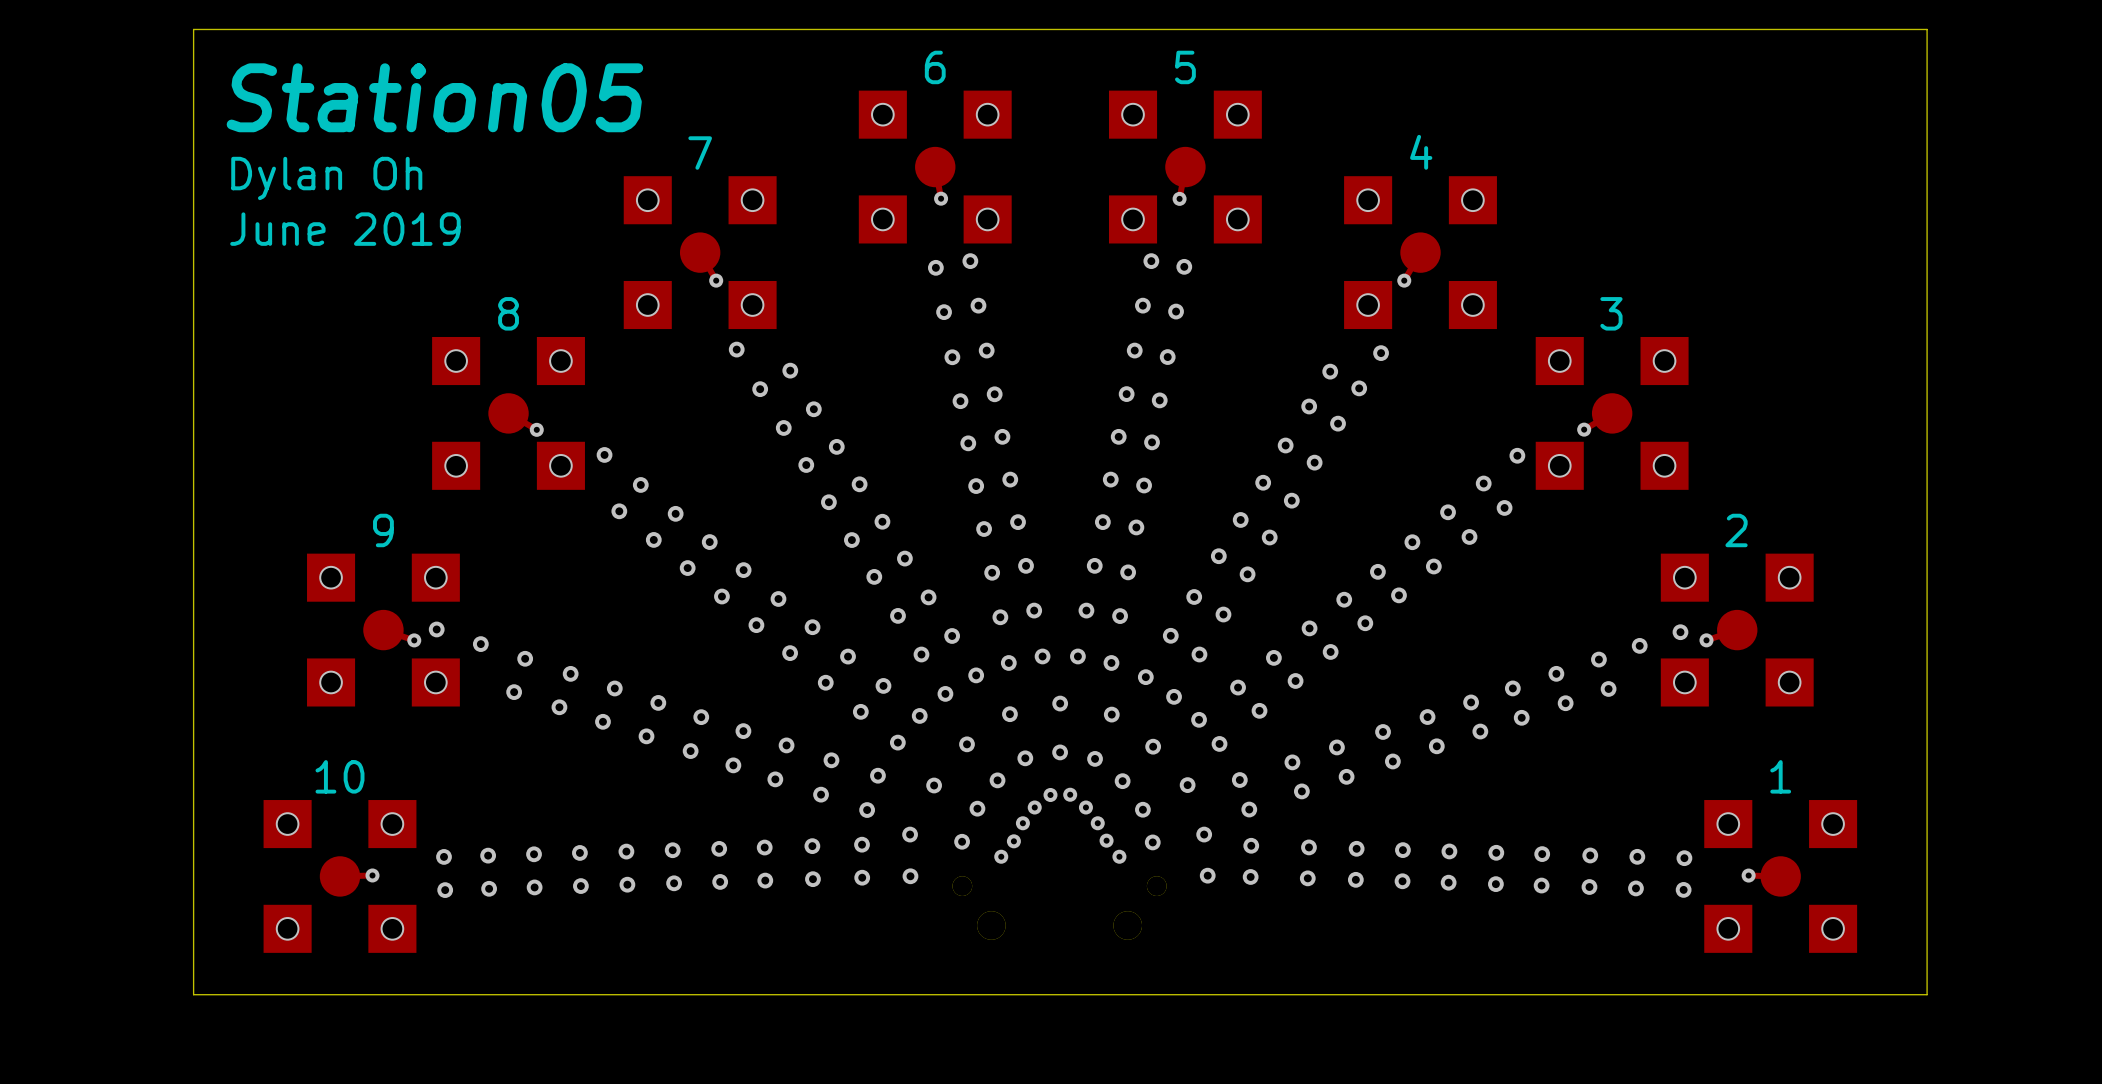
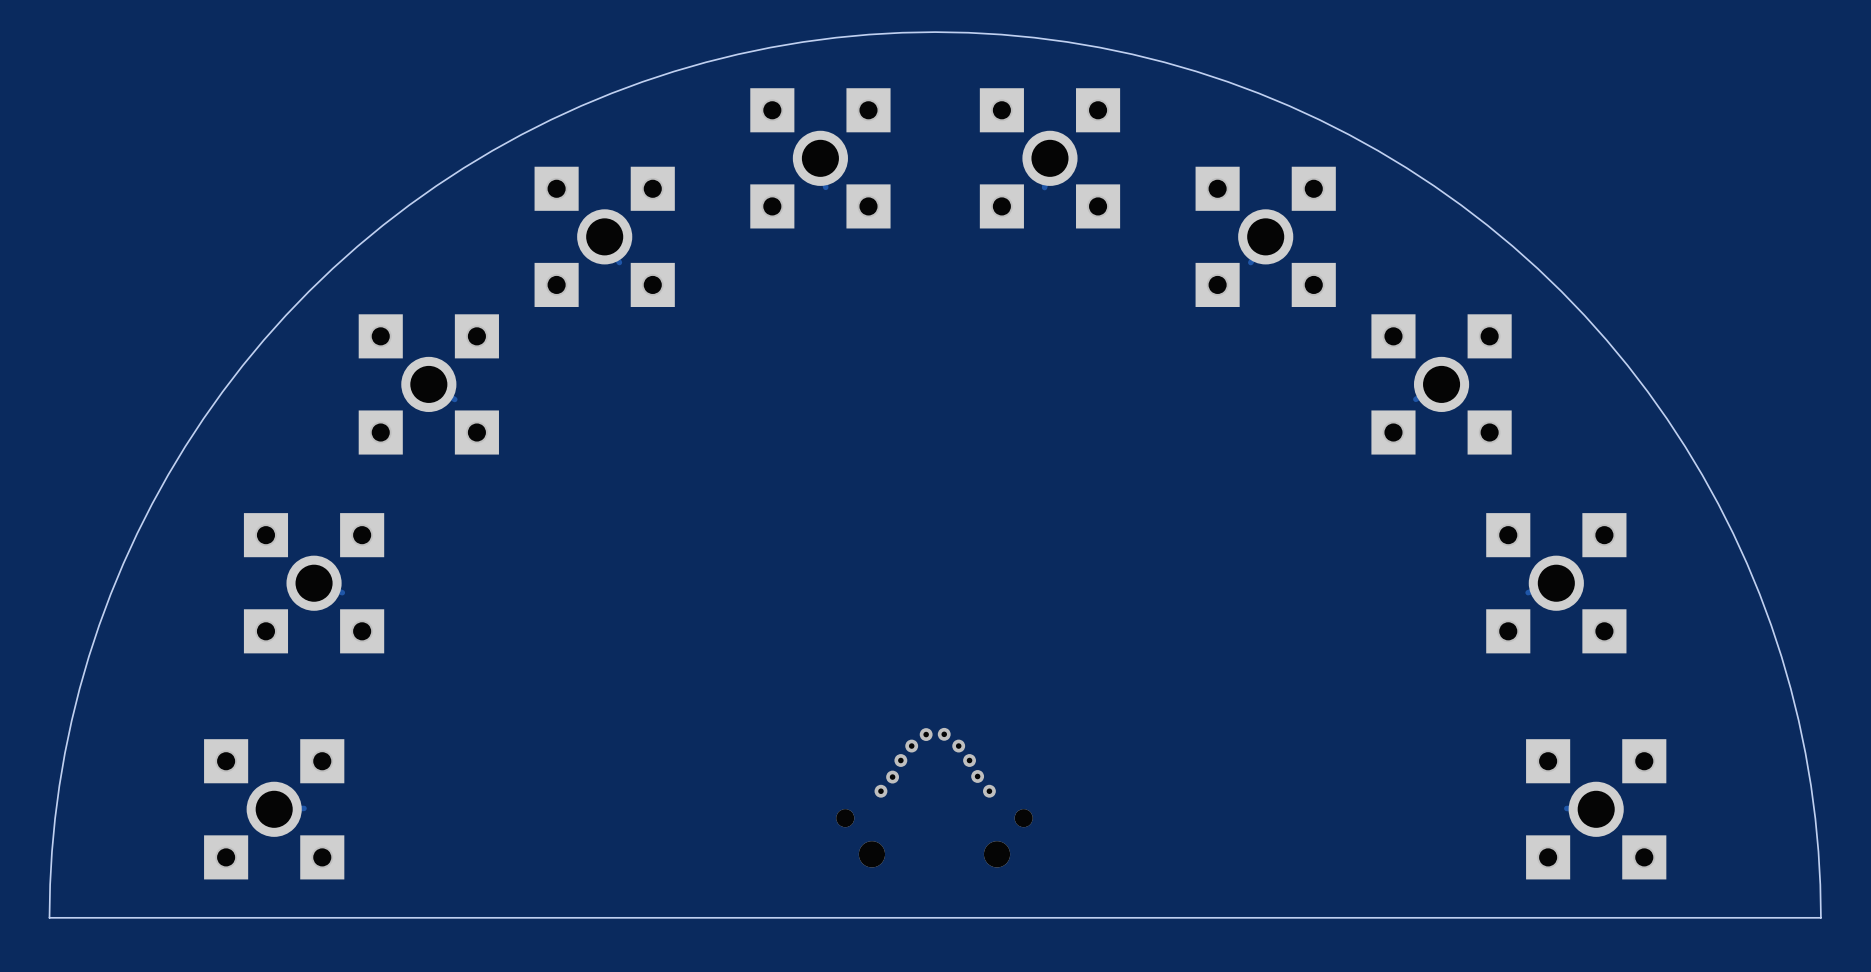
text: 6 (935, 67) -> none
text: 5 (1185, 67) -> none
part footprint: [858, 90, 1012, 244] -> [750, 88, 891, 229]
part footprint: [1109, 90, 1262, 244] -> [979, 88, 1121, 229]
text: Station05 (434, 97) -> none
text: 4 (1421, 152) -> none
text: 7 (700, 153) -> none
part footprint: [623, 176, 777, 330] -> [534, 166, 675, 308]
part footprint: [1344, 176, 1497, 330] -> [1195, 166, 1336, 308]
text: Dylan Oh (326, 178) -> none
via: (941, 198) -> none
via: (1179, 198) -> none
text: June 2019 (345, 229) -> none
via: (970, 261) -> none
via: (1151, 261) -> none
via: (1184, 266) -> none
via: (935, 267) -> none
via: (716, 280) -> none
via: (1404, 280) -> none
via: (978, 305) -> none
via: (1142, 305) -> none
via: (1176, 311) -> none
via: (944, 312) -> none
text: 8 (508, 313) -> none
text: 3 (1611, 313) -> none
part footprint: [432, 336, 585, 490] -> [358, 314, 499, 455]
part footprint: [1535, 336, 1689, 490] -> [1371, 314, 1512, 455]
via: (736, 349) -> none
via: (986, 350) -> none
via: (1134, 350) -> none
via: (1381, 353) -> none
via: (952, 357) -> none
via: (1167, 357) -> none
via: (790, 370) -> none
via: (1330, 371) -> none
via: (1359, 388) -> none
via: (760, 389) -> none
via: (994, 394) -> none
via: (1126, 394) -> none
via: (1159, 400) -> none
via: (960, 401) -> none
via: (1309, 406) -> none
via: (813, 409) -> none
via: (1338, 423) -> none
via: (783, 427) -> none
via: (536, 429) -> none
via: (1584, 429) -> none
via: (1002, 436) -> none
via: (1118, 436) -> none
via: (1152, 442) -> none
via: (968, 443) -> none
via: (1285, 445) -> none
via: (836, 446) -> none
via: (604, 454) -> none
via: (1517, 455) -> none
via: (1314, 462) -> none
via: (806, 465) -> none
via: (1010, 479) -> none
via: (1110, 479) -> none
via: (1263, 482) -> none
via: (1483, 483) -> none
via: (640, 484) -> none
via: (859, 484) -> none
via: (1144, 485) -> none
via: (976, 486) -> none
via: (1291, 500) -> none
via: (828, 502) -> none
via: (1504, 507) -> none
via: (619, 511) -> none
via: (1448, 512) -> none
via: (675, 513) -> none
via: (1240, 519) -> none
via: (882, 521) -> none
via: (1018, 522) -> none
via: (1102, 522) -> none
via: (1136, 527) -> none
via: (984, 529) -> none
text: 9 (383, 530) -> none
text: 2 (1736, 530) -> none
via: (1469, 536) -> none
via: (1269, 537) -> none
via: (653, 539) -> none
via: (851, 540) -> none
via: (709, 542) -> none
via: (1412, 542) -> none
part footprint: [307, 553, 460, 707] -> [243, 513, 385, 654]
part footprint: [1660, 553, 1814, 707] -> [1486, 513, 1627, 654]
via: (1218, 556) -> none
via: (904, 558) -> none
via: (1026, 565) -> none
via: (1094, 565) -> none
via: (1433, 566) -> none
via: (687, 568) -> none
via: (743, 570) -> none
via: (1377, 571) -> none
via: (992, 572) -> none
via: (1128, 572) -> none
via: (1247, 574) -> none
via: (874, 576) -> none
via: (1398, 595) -> none
via: (721, 596) -> none
via: (1194, 596) -> none
via: (928, 597) -> none
via: (778, 598) -> none
via: (1344, 599) -> none
via: (1034, 610) -> none
via: (1086, 610) -> none
via: (1223, 614) -> none
via: (898, 615) -> none
via: (1120, 616) -> none
via: (1000, 617) -> none
via: (1365, 623) -> none
via: (756, 625) -> none
via: (812, 627) -> none
via: (1309, 628) -> none
via: (436, 629) -> none
via: (1680, 632) -> none
via: (952, 635) -> none
via: (1170, 635) -> none
via: (414, 640) -> none
via: (1706, 640) -> none
via: (480, 644) -> none
via: (1639, 645) -> none
via: (1330, 651) -> none
via: (790, 653) -> none
via: (921, 654) -> none
via: (1199, 654) -> none
via: (848, 656) -> none
via: (1042, 656) -> none
via: (1077, 656) -> none
via: (1273, 657) -> none
via: (525, 658) -> none
via: (1598, 659) -> none
via: (1008, 662) -> none
via: (1111, 662) -> none
via: (570, 673) -> none
via: (1556, 673) -> none
via: (976, 675) -> none
via: (1145, 677) -> none
via: (1295, 680) -> none
via: (825, 682) -> none
via: (883, 685) -> none
via: (1238, 687) -> none
via: (614, 688) -> none
via: (1512, 688) -> none
via: (1608, 688) -> none
via: (514, 692) -> none
via: (945, 693) -> none
via: (1174, 696) -> none
via: (658, 702) -> none
via: (1471, 702) -> none
via: (1060, 703) -> none
via: (1565, 703) -> none
via: (559, 707) -> none
via: (1259, 710) -> none
via: (860, 711) -> none
via: (1009, 714) -> none
via: (1111, 714) -> none
via: (919, 715) -> none
via: (701, 717) -> none
via: (1427, 717) -> none
via: (1521, 717) -> none
via: (1199, 719) -> none
via: (602, 721) -> none
via: (743, 731) -> none
via: (1383, 731) -> none
via: (1480, 731) -> none
via: (646, 736) -> none
via: (897, 742) -> none
via: (1219, 743) -> none
via: (967, 744) -> none
via: (786, 745) -> none
via: (1153, 746) -> none
via: (1436, 746) -> none
via: (1336, 747) -> none
via: (690, 751) -> none
via: (1060, 752) -> none
via: (1025, 758) -> none
via: (1095, 758) -> none
via: (831, 760) -> none
via: (1392, 761) -> none
via: (1292, 762) -> none
via: (733, 765) -> none
via: (877, 775) -> none
text: 10 (340, 776) -> none
via: (1346, 776) -> none
text: 1 (1780, 776) -> none
via: (775, 779) -> none
via: (997, 780) -> none
via: (1239, 780) -> none
via: (1122, 781) -> none
via: (934, 785) -> none
via: (1187, 785) -> none
via: (1301, 791) -> none
via: (821, 794) -> none
part footprint: [263, 800, 417, 953] -> [204, 739, 345, 880]
part footprint: [1704, 800, 1858, 953] -> [1526, 739, 1667, 880]
via: (977, 808) -> none
via: (1142, 809) -> none
via: (1249, 809) -> none
via: (867, 810) -> none
via: (910, 834) -> none
via: (1204, 834) -> none
via: (962, 841) -> none
via: (1152, 842) -> none
via: (862, 844) -> none
via: (1251, 845) -> none
via: (812, 846) -> none
via: (764, 847) -> none
via: (1308, 847) -> none
via: (719, 848) -> none
via: (1356, 848) -> none
via: (672, 850) -> none
via: (1402, 850) -> none
via: (626, 851) -> none
via: (1449, 851) -> none
via: (579, 852) -> none
via: (1496, 852) -> none
via: (534, 854) -> none
via: (1542, 854) -> none
via: (488, 855) -> none
via: (1590, 855) -> none
via: (444, 856) -> none
via: (1637, 856) -> none
via: (1684, 858) -> none
via: (372, 875) -> none
via: (1207, 875) -> none
via: (1748, 875) -> none
via: (910, 876) -> none
via: (1250, 876) -> none
via: (862, 877) -> none
via: (1307, 878) -> none
via: (812, 879) -> none
via: (1355, 879) -> none
via: (765, 880) -> none
via: (720, 881) -> none
via: (1402, 881) -> none
via: (1448, 882) -> none
via: (674, 883) -> none
via: (627, 884) -> none
via: (1495, 884) -> none
via: (1541, 885) -> none
via: (580, 886) -> none
via: (534, 887) -> none
via: (1589, 887) -> none
via: (489, 888) -> none
via: (1635, 888) -> none
via: (1683, 889) -> none
via: (445, 890) -> none
board edge: (193, 994) (193, 29) (1927, 29) (1927, 994) -> (139, 917) (49, 917) (55, 818) (71, 720) (99, 625) (123, 563) (152, 503) (203, 418) (242, 365) (285, 315) (332, 268) (409, 205) (492, 150) (581, 106) (674, 71) (770, 47) (836, 37) (935, 32) (1034, 37) (1099, 47) (1196, 71) (1289, 106) (1378, 150) (1434, 186) (1512, 246) (1584, 315) (1627, 365) (1667, 418) (1718, 503) (1747, 563) (1771, 625) (1798, 720) (1815, 818) (1820, 917) (1730, 917)

